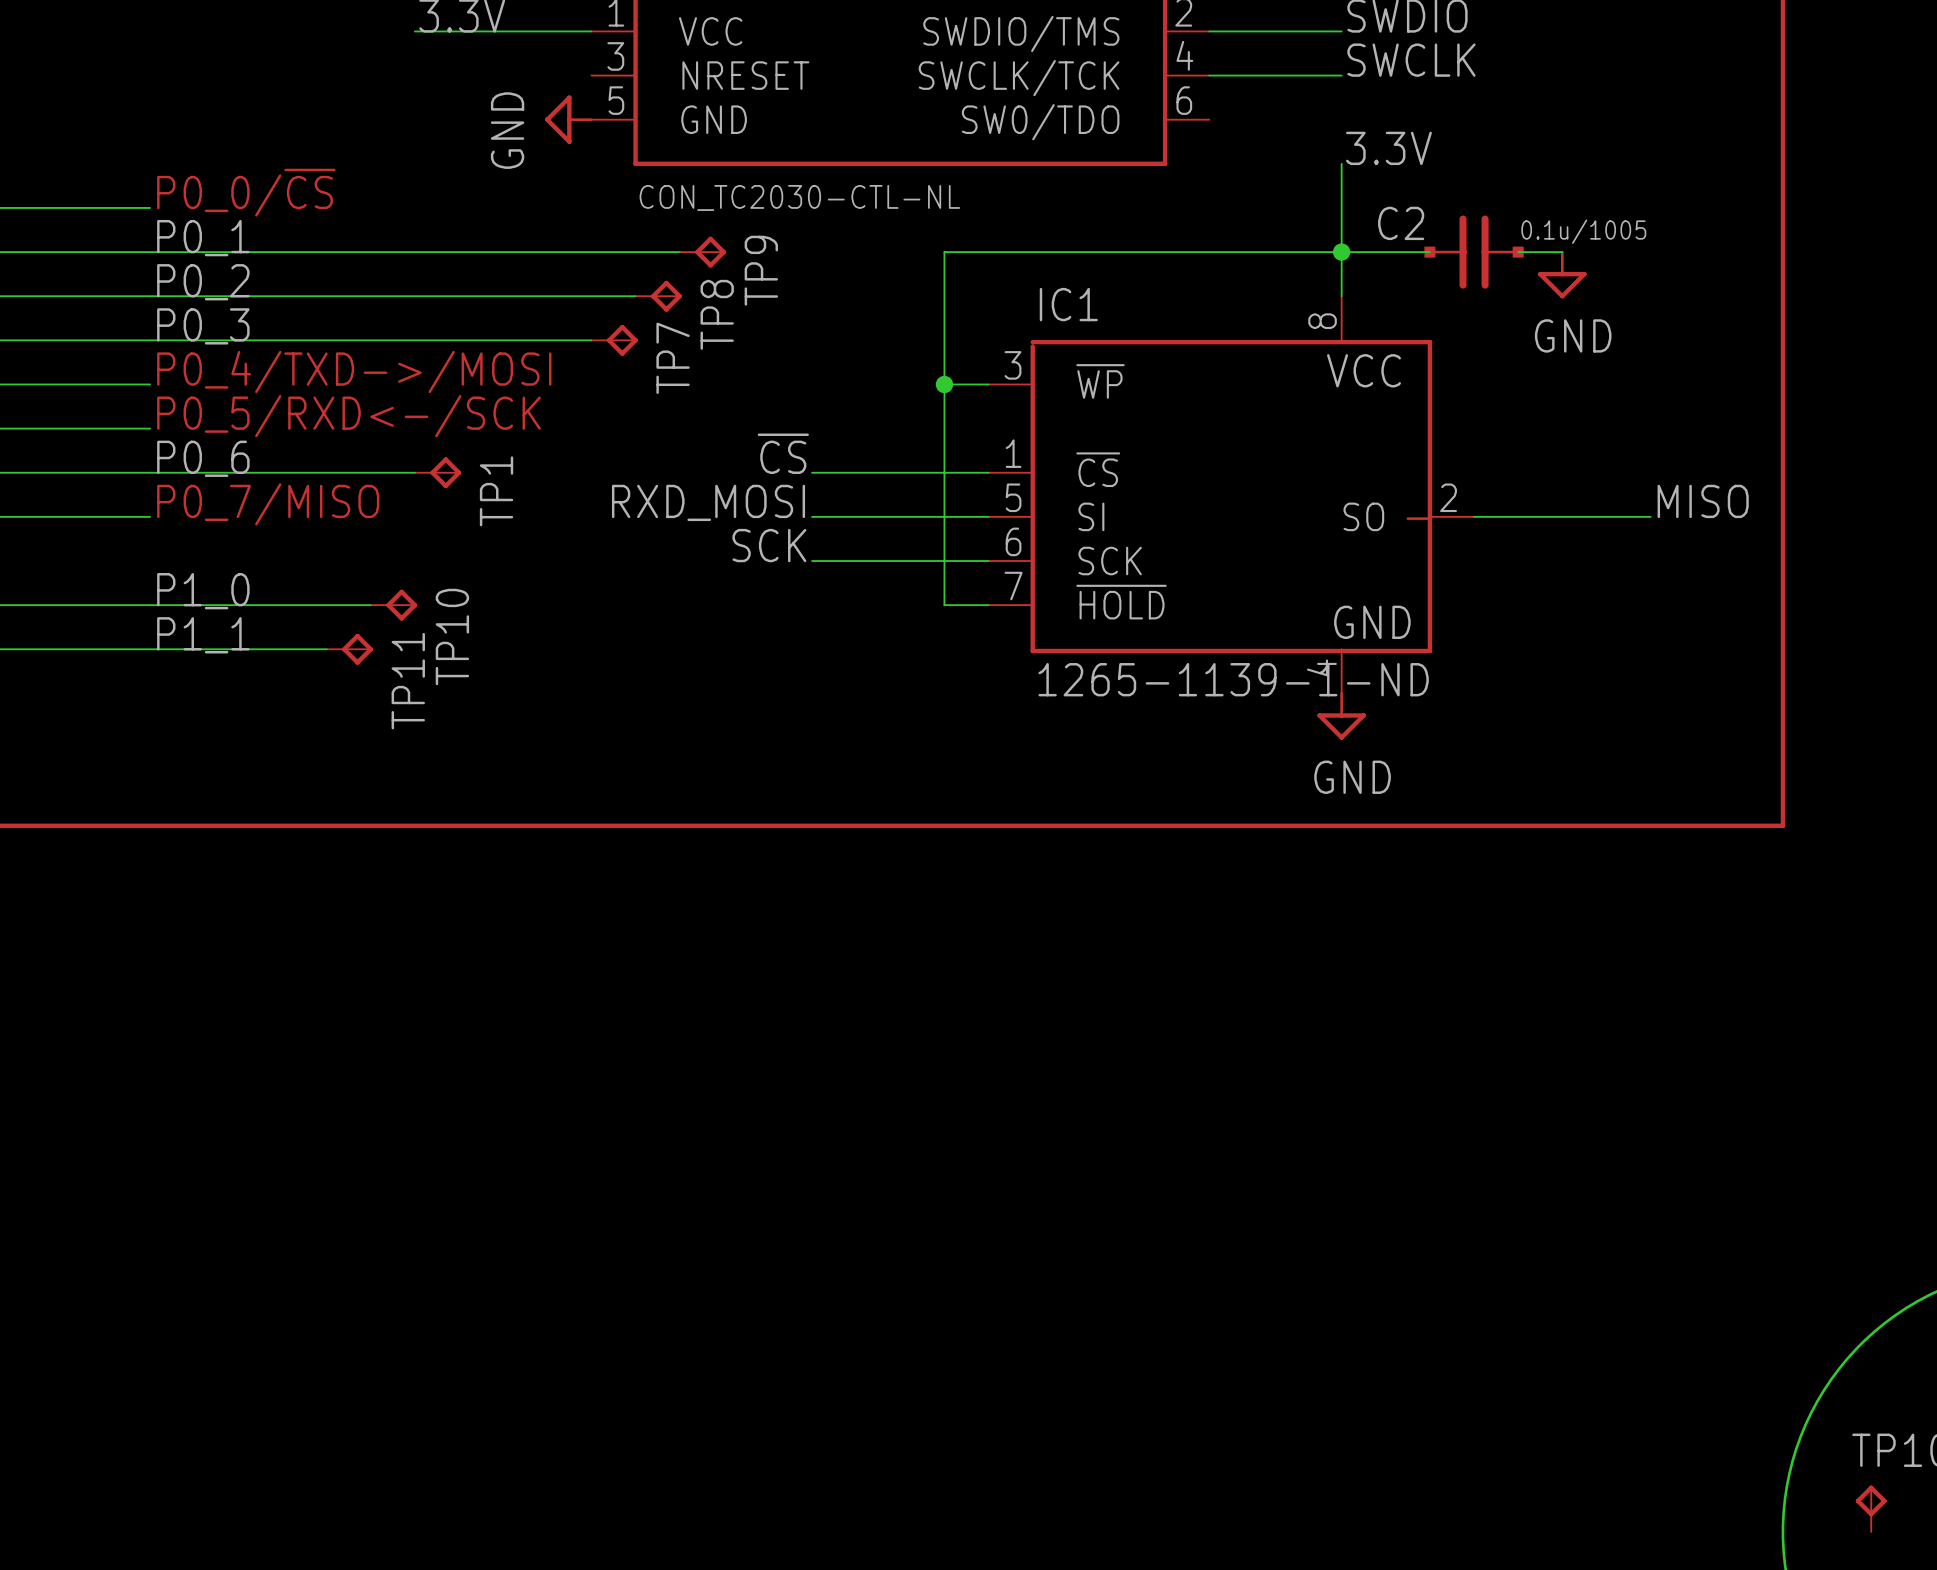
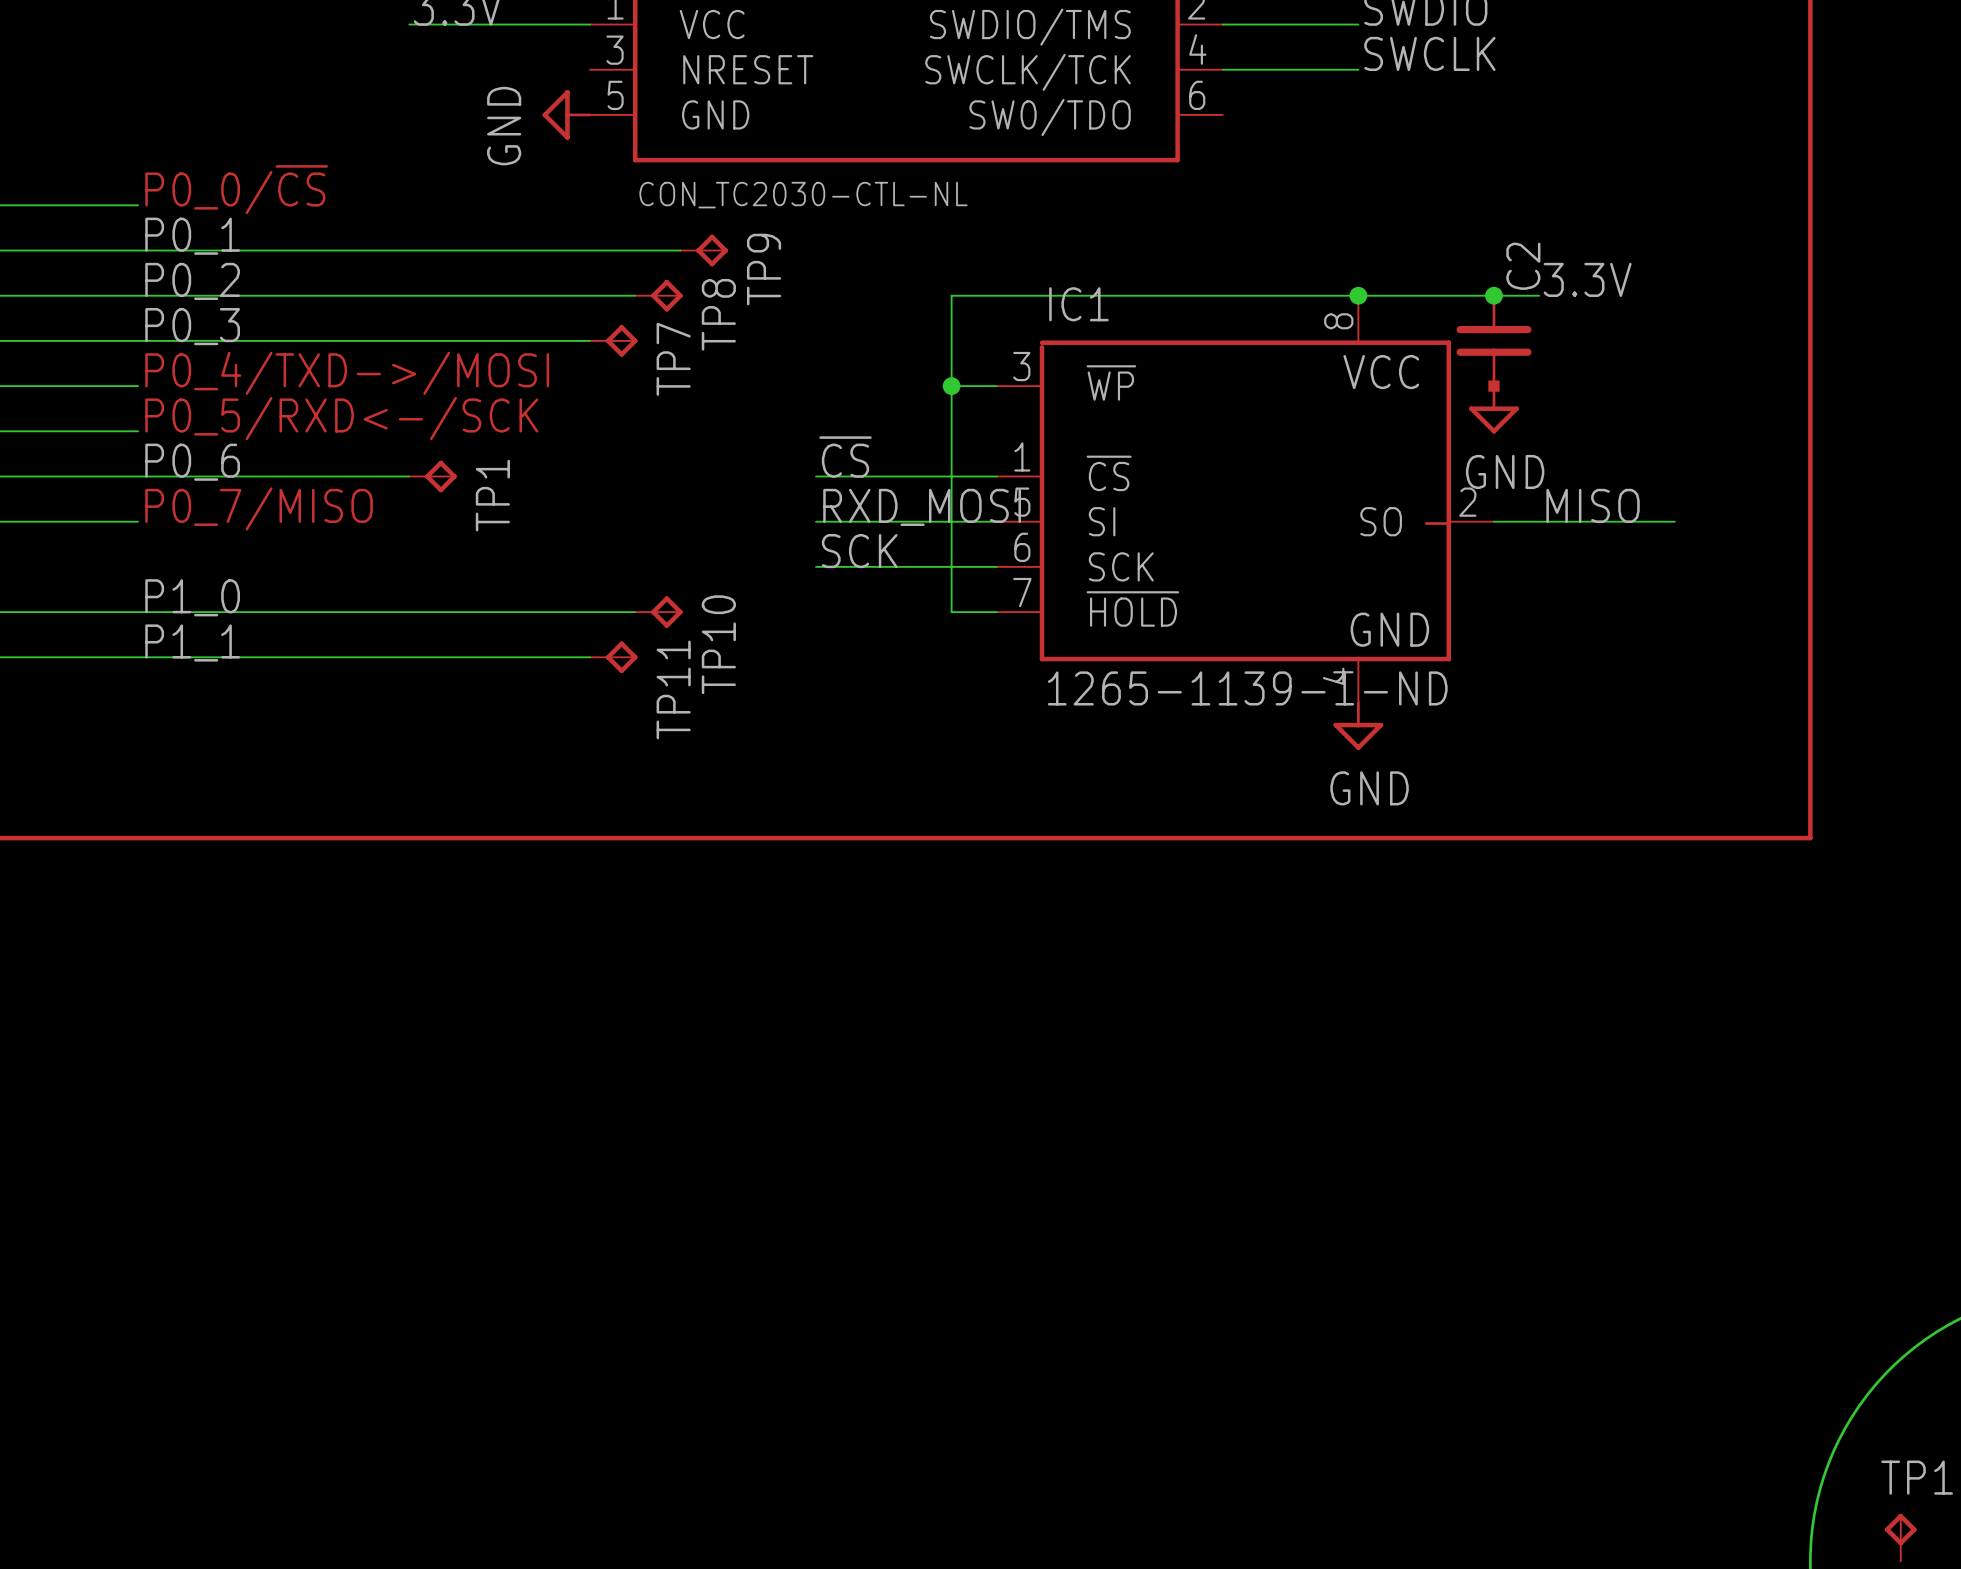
label position: 3.3V (1388, 148) -> 3.3V (1587, 279)
wire: (1341, 163) (1341, 296) -> none
C2 value: 0.1u/1005 (1583, 231) -> none
junction position: (1341, 252) -> (1358, 295)
wire: (1429, 252) (944, 252) (944, 296) -> (1539, 295) (951, 295)
C2 rotation: 0° (1474, 252) -> 90° clockwise (1493, 340)
C2 position: (1474, 252) -> (1493, 340)
wire: (1518, 252) (1562, 252) -> none
power symbol position: GND (1562, 274) -> GND (1493, 409)
junction: none -> (1493, 295)
label position: ~{CS} (783, 453) -> ~{CS} (845, 457)
label position: MISO (1703, 501) -> MISO (1593, 505)
label position: RXD_MOSI (708, 502) -> RXD_MOSI (922, 507)
label position: SCK (769, 545) -> SCK (859, 551)
wire: none -> (364, 612) (635, 612)
TP10 position: (393, 605) -> (658, 612)
wire: none -> (318, 657) (590, 657)
TP11 position: (349, 649) -> (613, 657)

